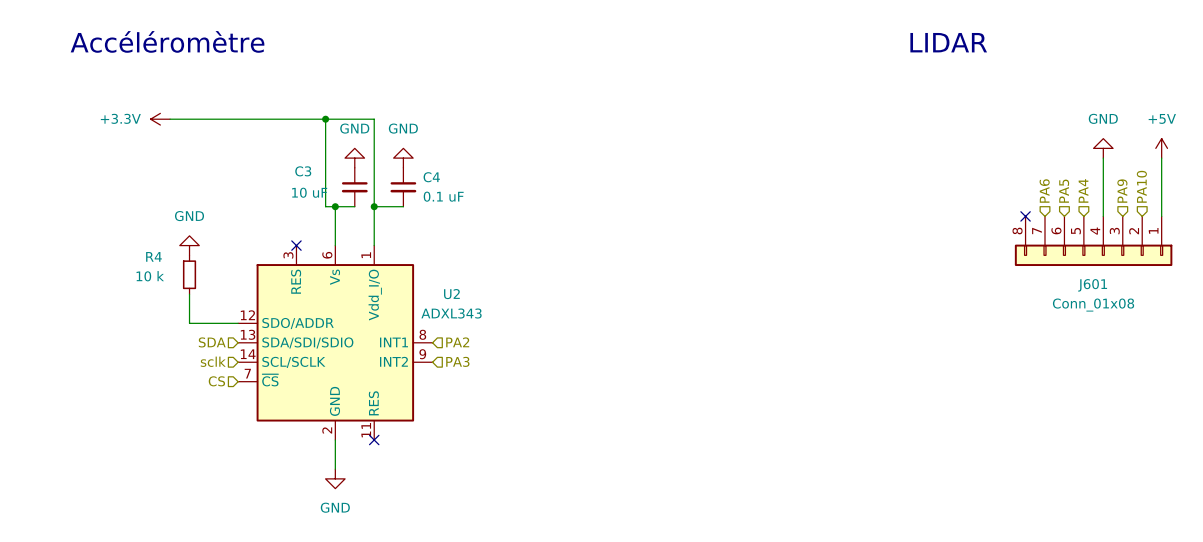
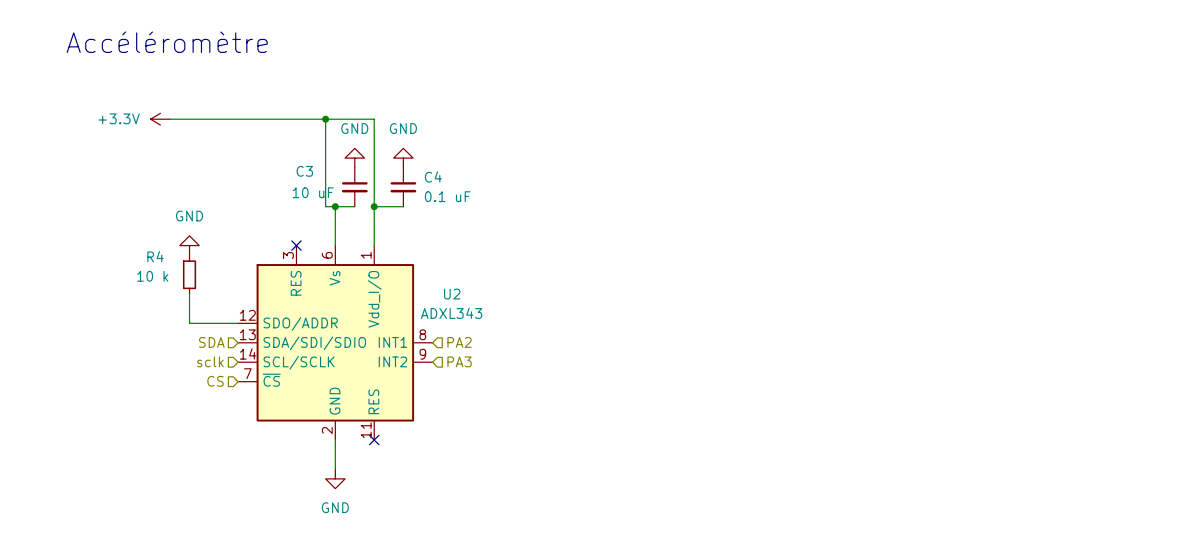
text: LIDAR (948, 42) -> none
power symbol: GND (1103, 148) -> none
power symbol: +5V (1161, 148) -> none
wire: (1103, 158) (1103, 216) -> none
wire: (1161, 158) (1161, 216) -> none
hierarchical label: PA10 (1141, 186) -> none
hierarchical label: PA4 (1083, 190) -> none
hierarchical label: PA6 (1044, 191) -> none
hierarchical label: PA5 (1064, 191) -> none
hierarchical label: PA9 (1122, 191) -> none
no-connect mark: (1025, 216) -> none
J601: Conn_01x08 (1093, 241) -> none

